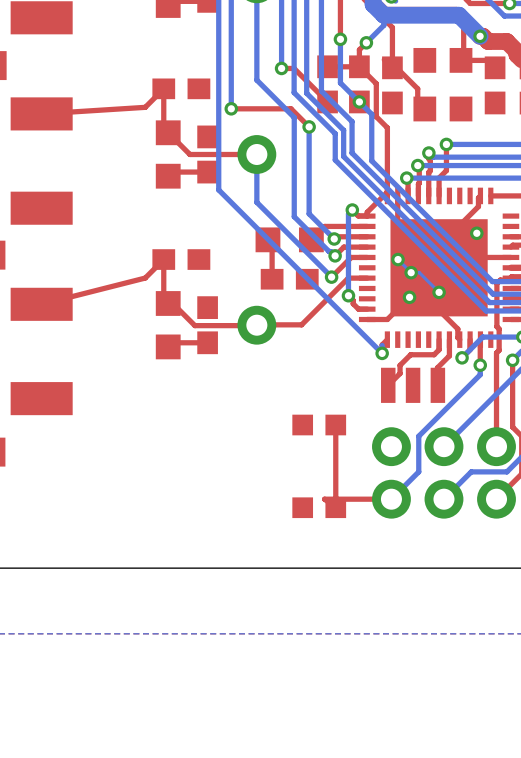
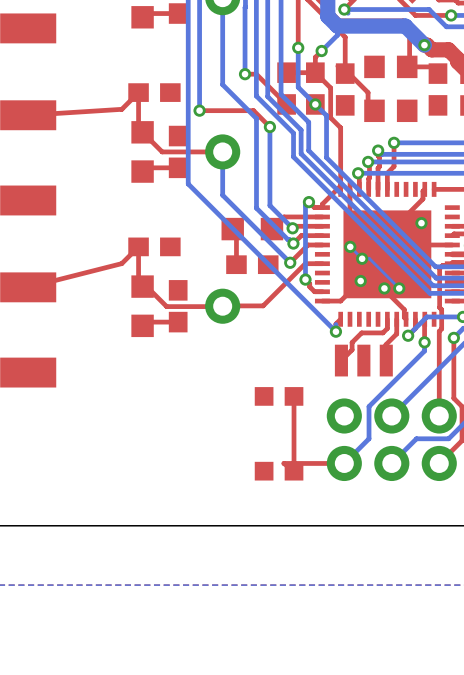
bottom track: none -> (387, 276) (399, 288)
via: (439, 292) -> none
via: none -> (384, 288)
via: none -> (399, 288)

